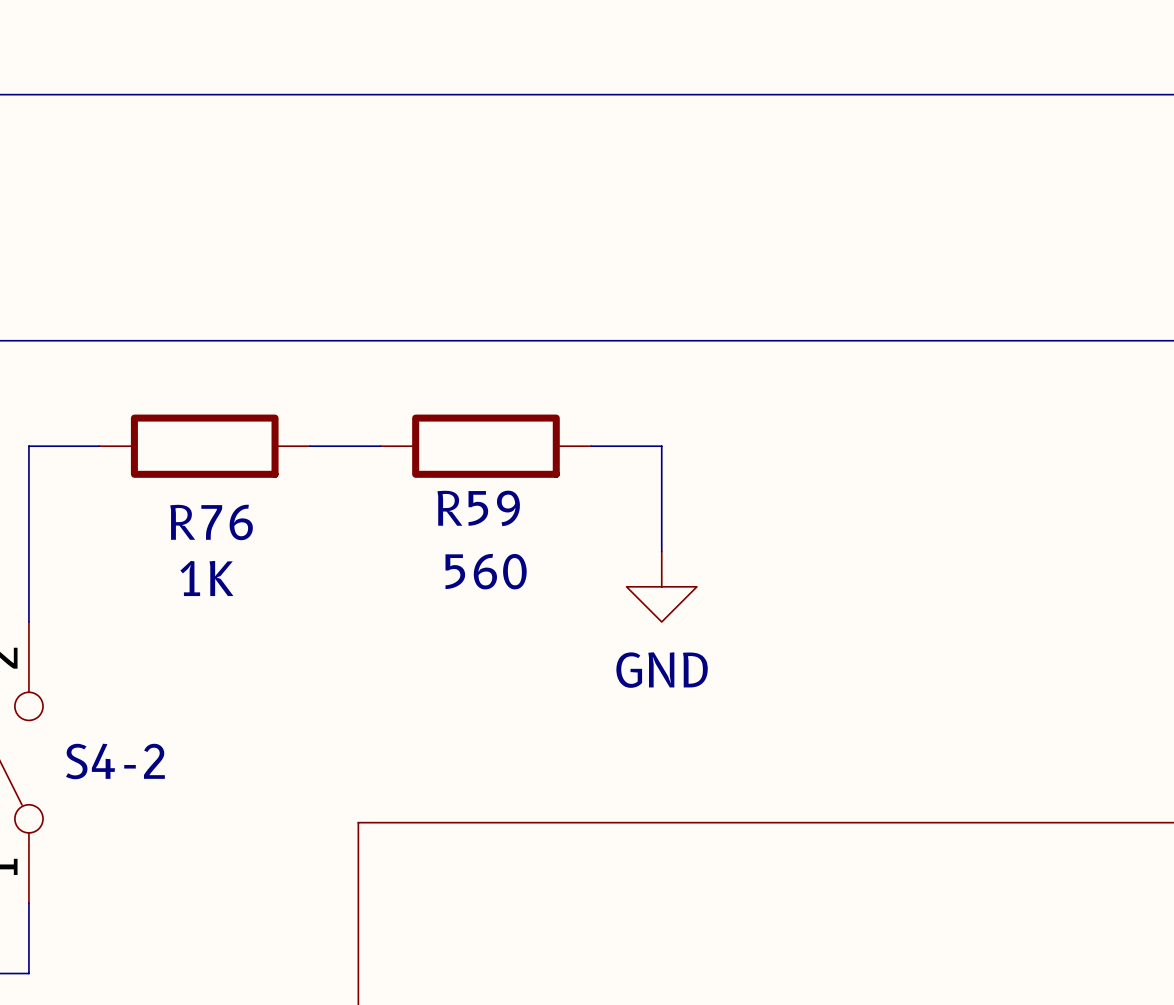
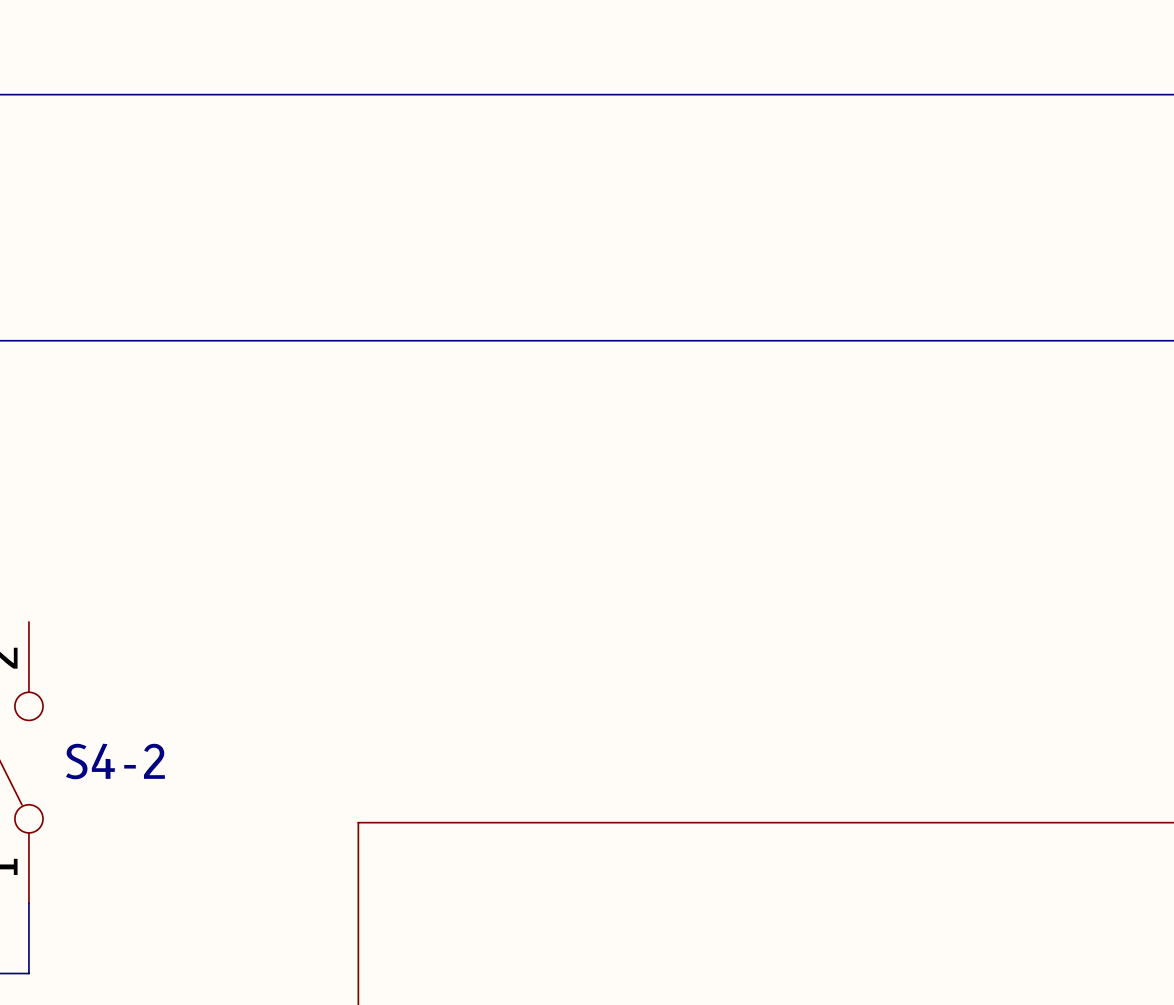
wire: (99, 446) (28, 446) (28, 621) -> none
R76: 1K (204, 446) -> none
wire: (310, 446) (380, 446) -> none
R59: 560 (485, 446) -> none
wire: (591, 446) (661, 446) (661, 551) -> none
power symbol: GND (661, 586) -> none

